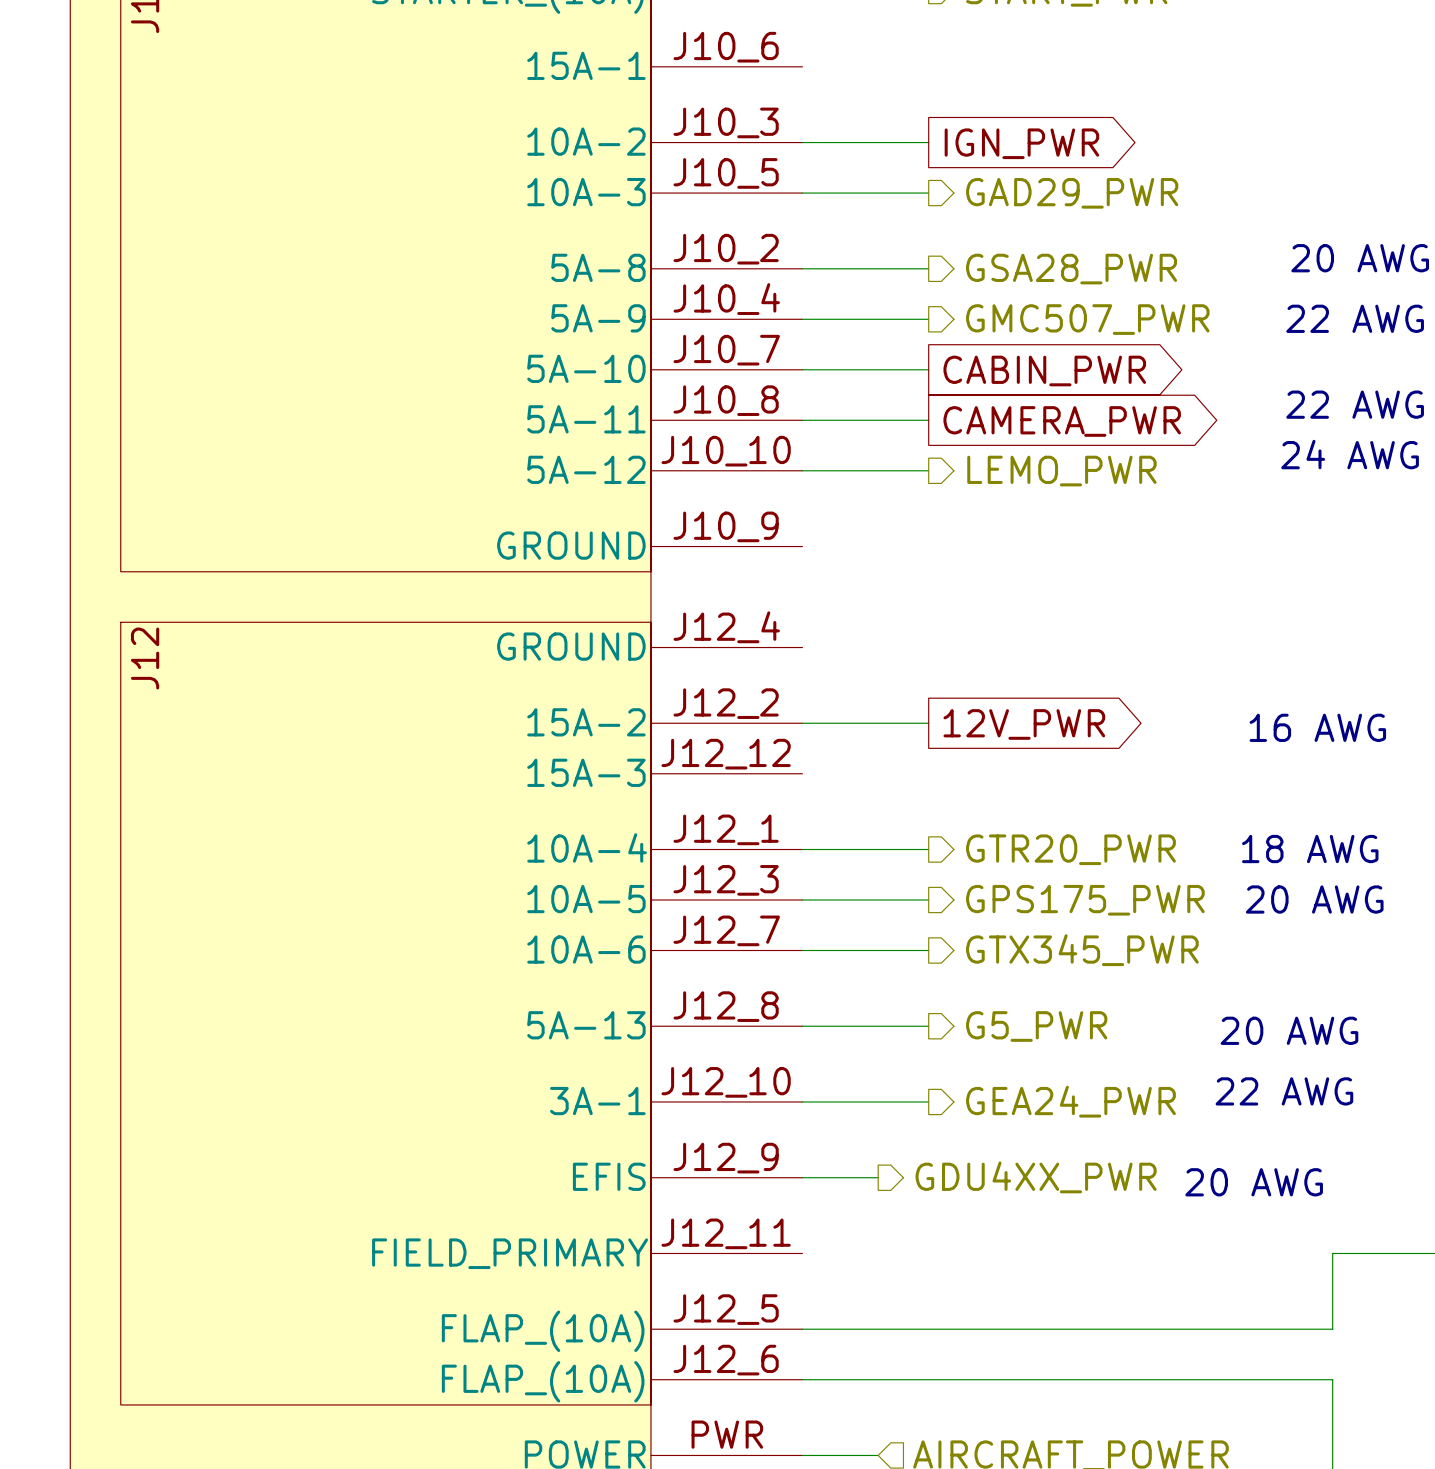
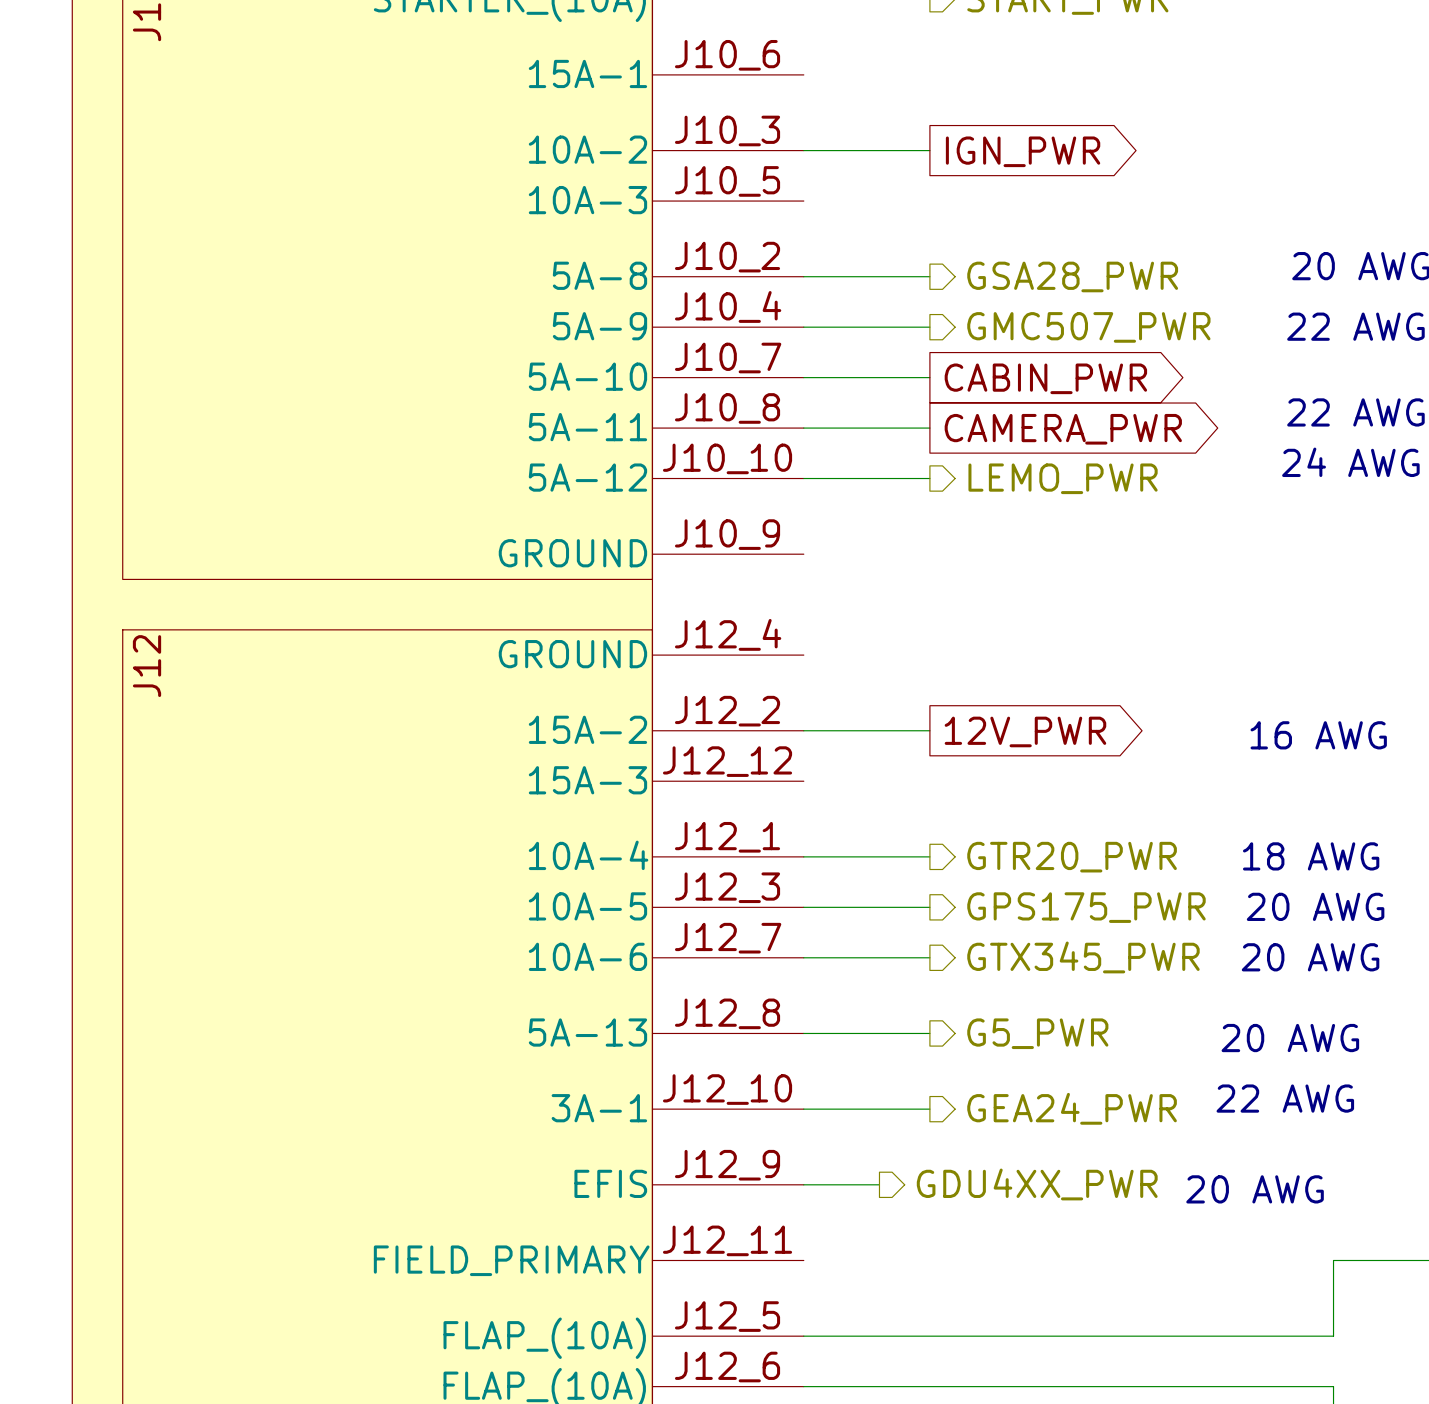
wire: (802, 193) (928, 193) -> none
hierarchical label: GAD29_PWR (1072, 193) -> none
text: none -> 20 AWG (1310, 957)

